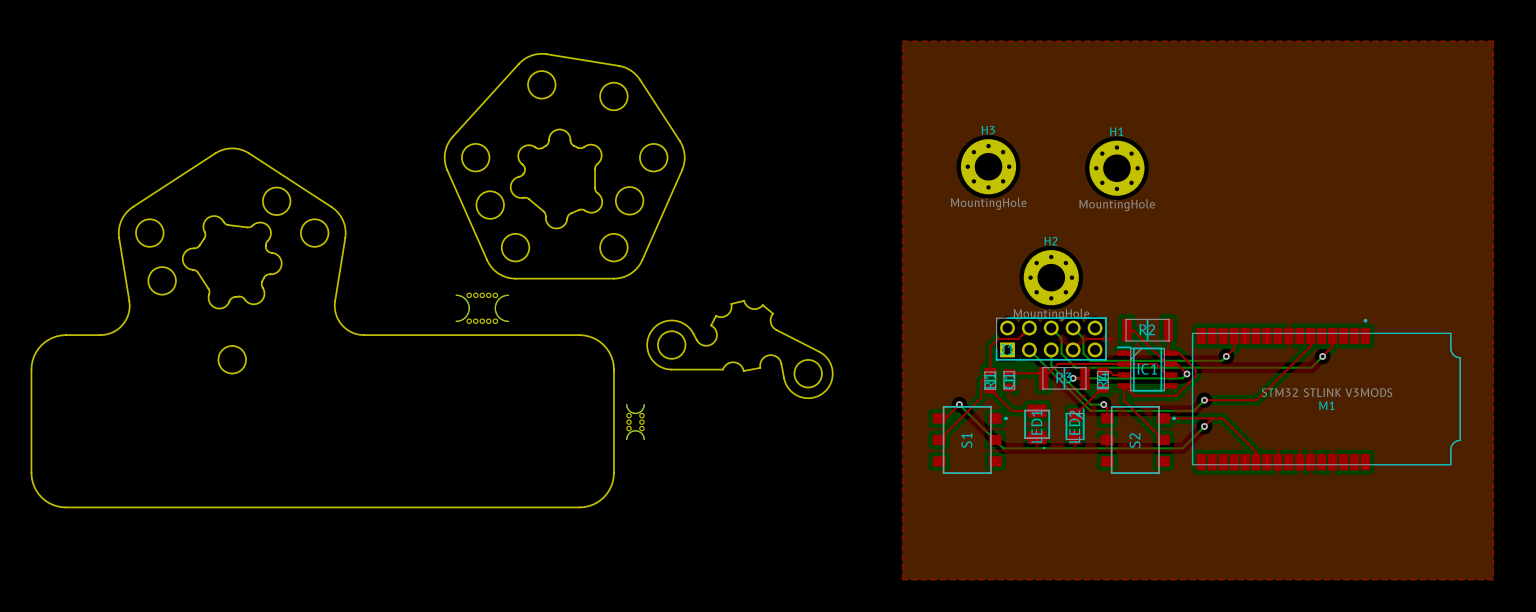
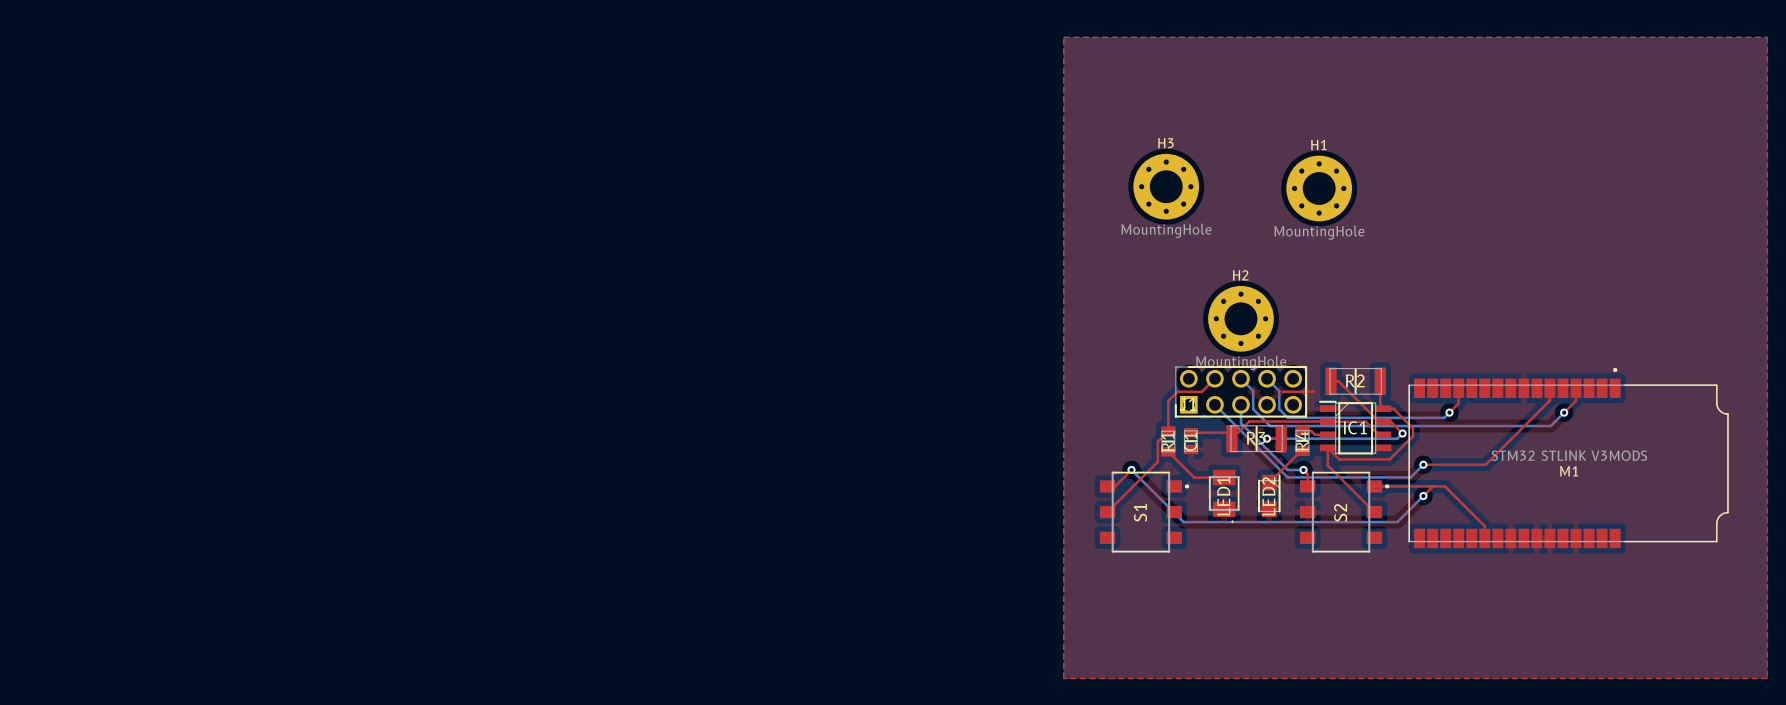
board edge: (546, 54) (618, 65) (630, 70) (639, 79) (683, 147) (683, 166) (642, 260) (633, 271) (624, 276) (613, 278) (515, 278) (498, 273) (487, 260) (446, 166) (445, 149) (452, 136) (521, 61) (535, 54) (546, 54) -> none
round board edge: [527, 70, 557, 100] -> none
round board edge: [599, 81, 629, 112] -> none
board edge: (570, 140) (566, 132) (558, 129) (551, 133) (547, 144) (542, 148) (529, 145) (522, 147) (518, 156) (524, 167) (524, 171) (513, 179) (510, 185) (511, 191) (514, 195) (527, 198) (544, 211) (547, 223) (554, 228) (563, 225) (570, 213) (581, 209) (595, 212) (600, 208) (602, 203) (601, 197) (595, 188) (595, 168) (601, 158) (600, 151) (592, 144) (578, 147) (572, 144) (570, 140) -> none
round board edge: [461, 143, 491, 173] -> none
round board edge: [639, 143, 669, 173] -> none
board edge: (215, 153) (132, 207) (123, 217) (118, 234) (129, 304) (128, 315) (122, 324) (114, 331) (103, 334) (56, 336) (44, 342) (36, 352) (31, 369) (31, 472) (34, 486) (41, 497) (52, 504) (65, 507) (579, 507) (592, 504) (603, 497) (611, 486) (613, 477) (613, 369) (611, 356) (603, 345) (592, 337) (579, 335) (364, 335) (350, 331) (339, 321) (334, 308) (345, 234) (344, 223) (339, 214) (331, 207) (246, 151) (228, 148) (215, 153) -> none
round board edge: [262, 186, 292, 216] -> none
round board edge: [614, 186, 645, 216] -> none
round board edge: [475, 190, 505, 220] -> none
round board edge: [135, 218, 165, 248] -> none
round board edge: [300, 218, 330, 248] -> none
board edge: (223, 221) (215, 216) (206, 219) (203, 225) (204, 237) (197, 247) (185, 252) (183, 262) (187, 268) (198, 272) (208, 289) (208, 300) (214, 307) (223, 307) (231, 298) (238, 296) (249, 303) (257, 303) (264, 296) (261, 283) (264, 277) (276, 272) (281, 265) (279, 256) (268, 252) (265, 247) (270, 235) (270, 228) (262, 222) (248, 227) (227, 224) (223, 221) -> none
round board edge: [500, 232, 531, 263] -> none
round board edge: [599, 232, 629, 263] -> none
round board edge: [147, 266, 177, 296] -> none
board edge: (456, 295) (465, 299) (469, 308) (464, 318) (456, 321) -> none
board edge: (508, 295) (499, 299) (495, 308) (499, 317) (508, 321) -> none
board edge: (744, 300) (731, 303) (730, 310) (726, 315) (716, 315) (711, 325) (716, 331) (716, 338) (709, 345) (699, 343) (690, 328) (680, 321) (668, 320) (659, 323) (652, 329) (647, 340) (647, 349) (651, 358) (657, 364) (668, 369) (723, 369) (727, 363) (733, 362) (740, 365) (743, 371) (760, 367) (763, 358) (772, 355) (780, 360) (785, 384) (793, 393) (808, 398) (817, 396) (825, 391) (830, 383) (832, 374) (831, 365) (826, 357) (774, 328) (770, 321) (773, 313) (762, 305) (757, 308) (752, 308) (746, 305) (744, 300) -> none
part: (482, 308) -> none
round board edge: [657, 330, 687, 360] -> none
round board edge: [217, 345, 247, 375] -> none
round board edge: [793, 359, 823, 389] -> none
board edge: (626, 404) (628, 410) (635, 413) (642, 410) (644, 404) -> none
part: (635, 422) -> none
board edge: (626, 439) (628, 433) (635, 430) (642, 433) (644, 439) -> none

